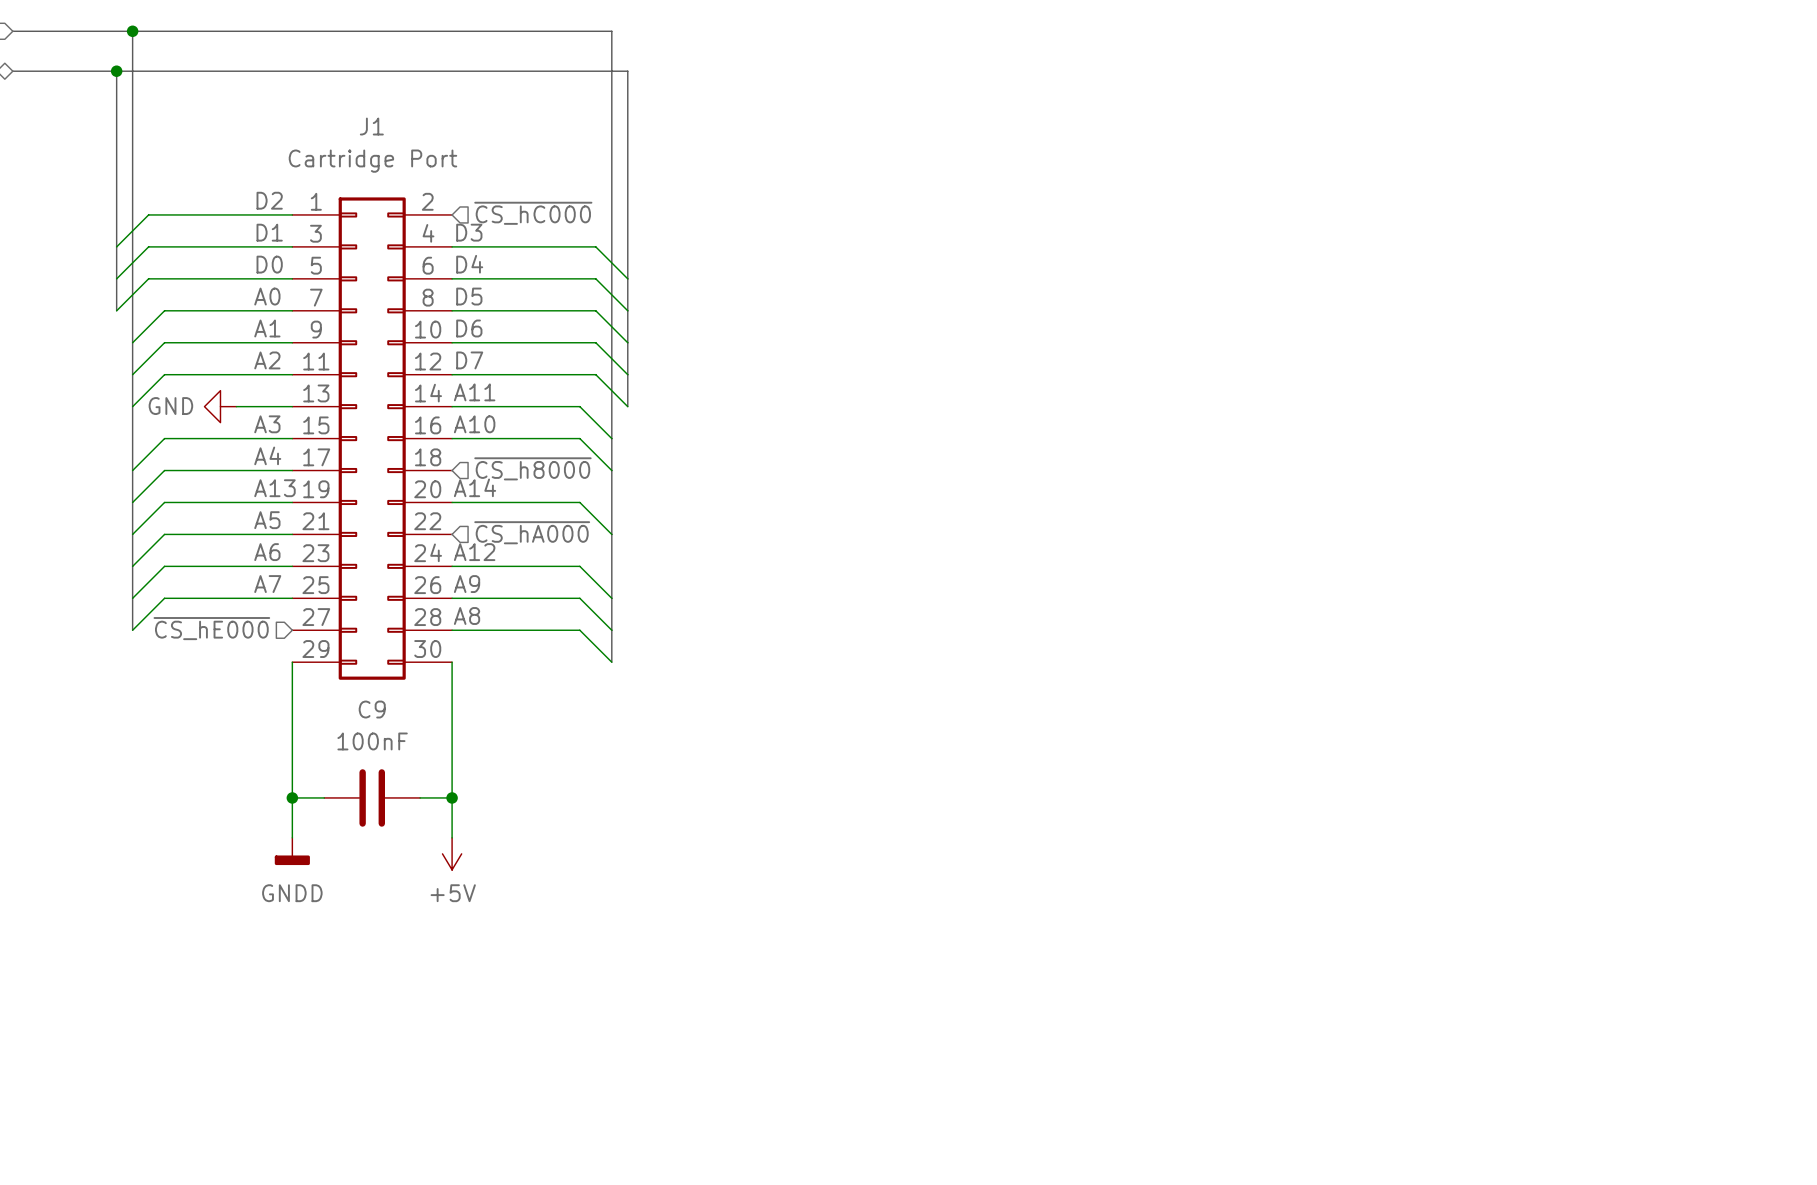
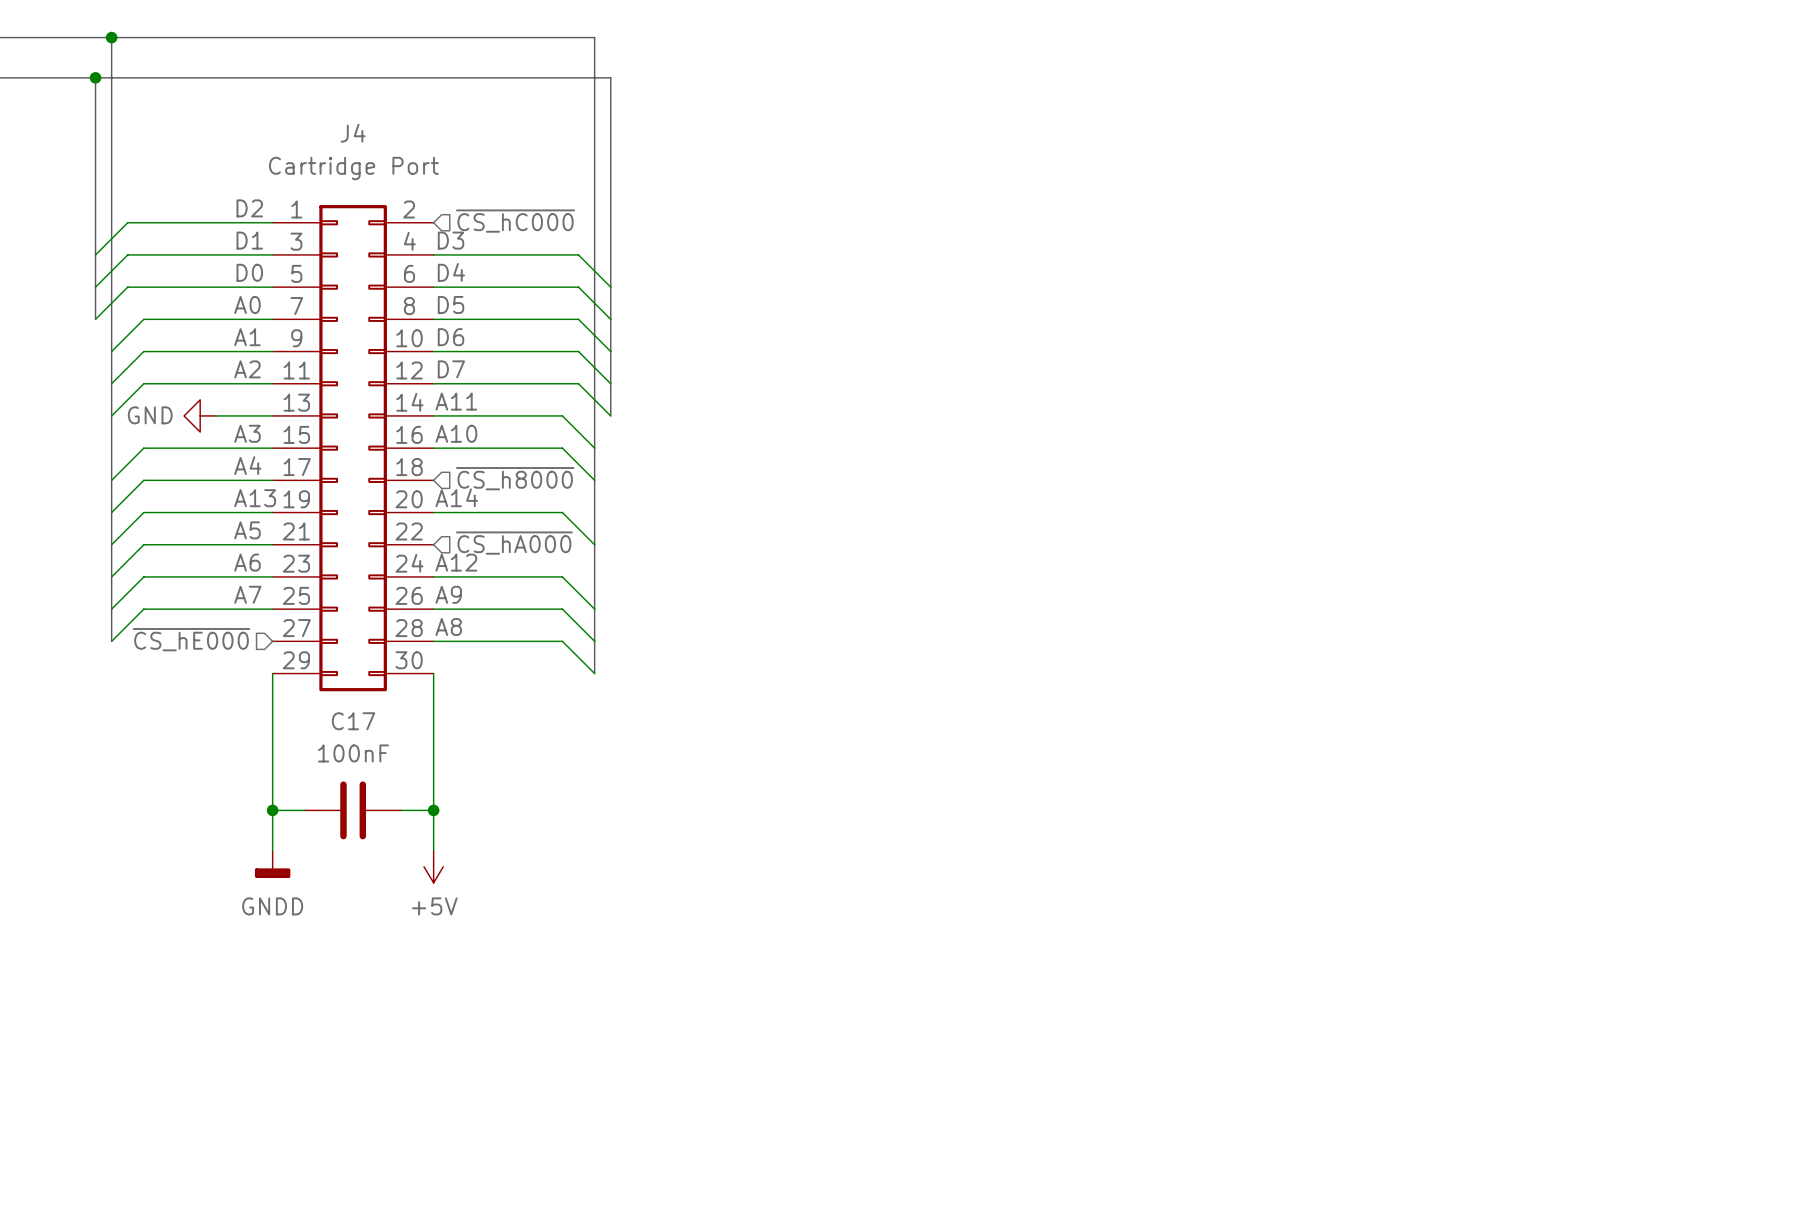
J1 name: J1 (371, 126) -> J4 (353, 133)
C9 name: C9 (372, 709) -> C17 (353, 721)

